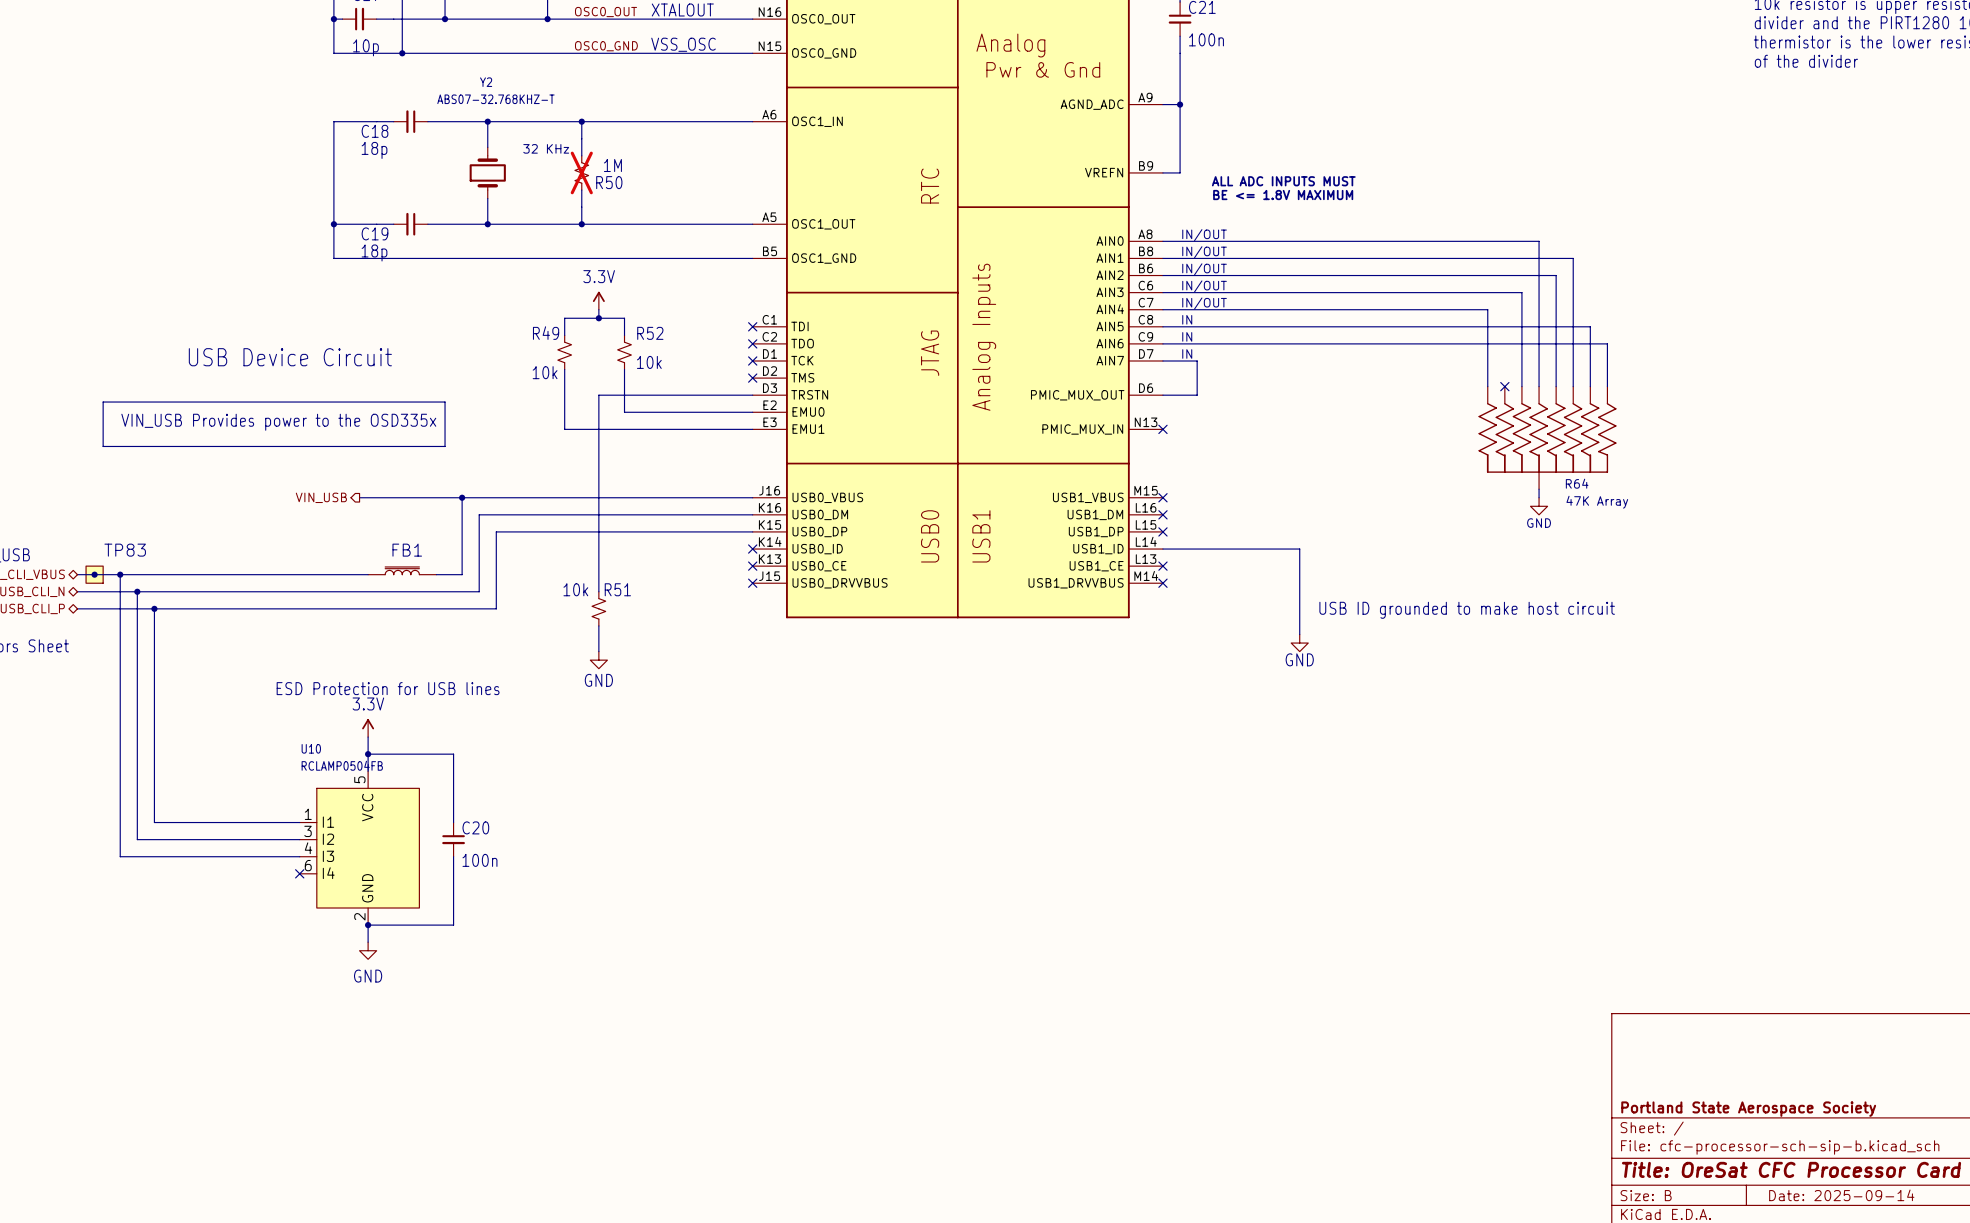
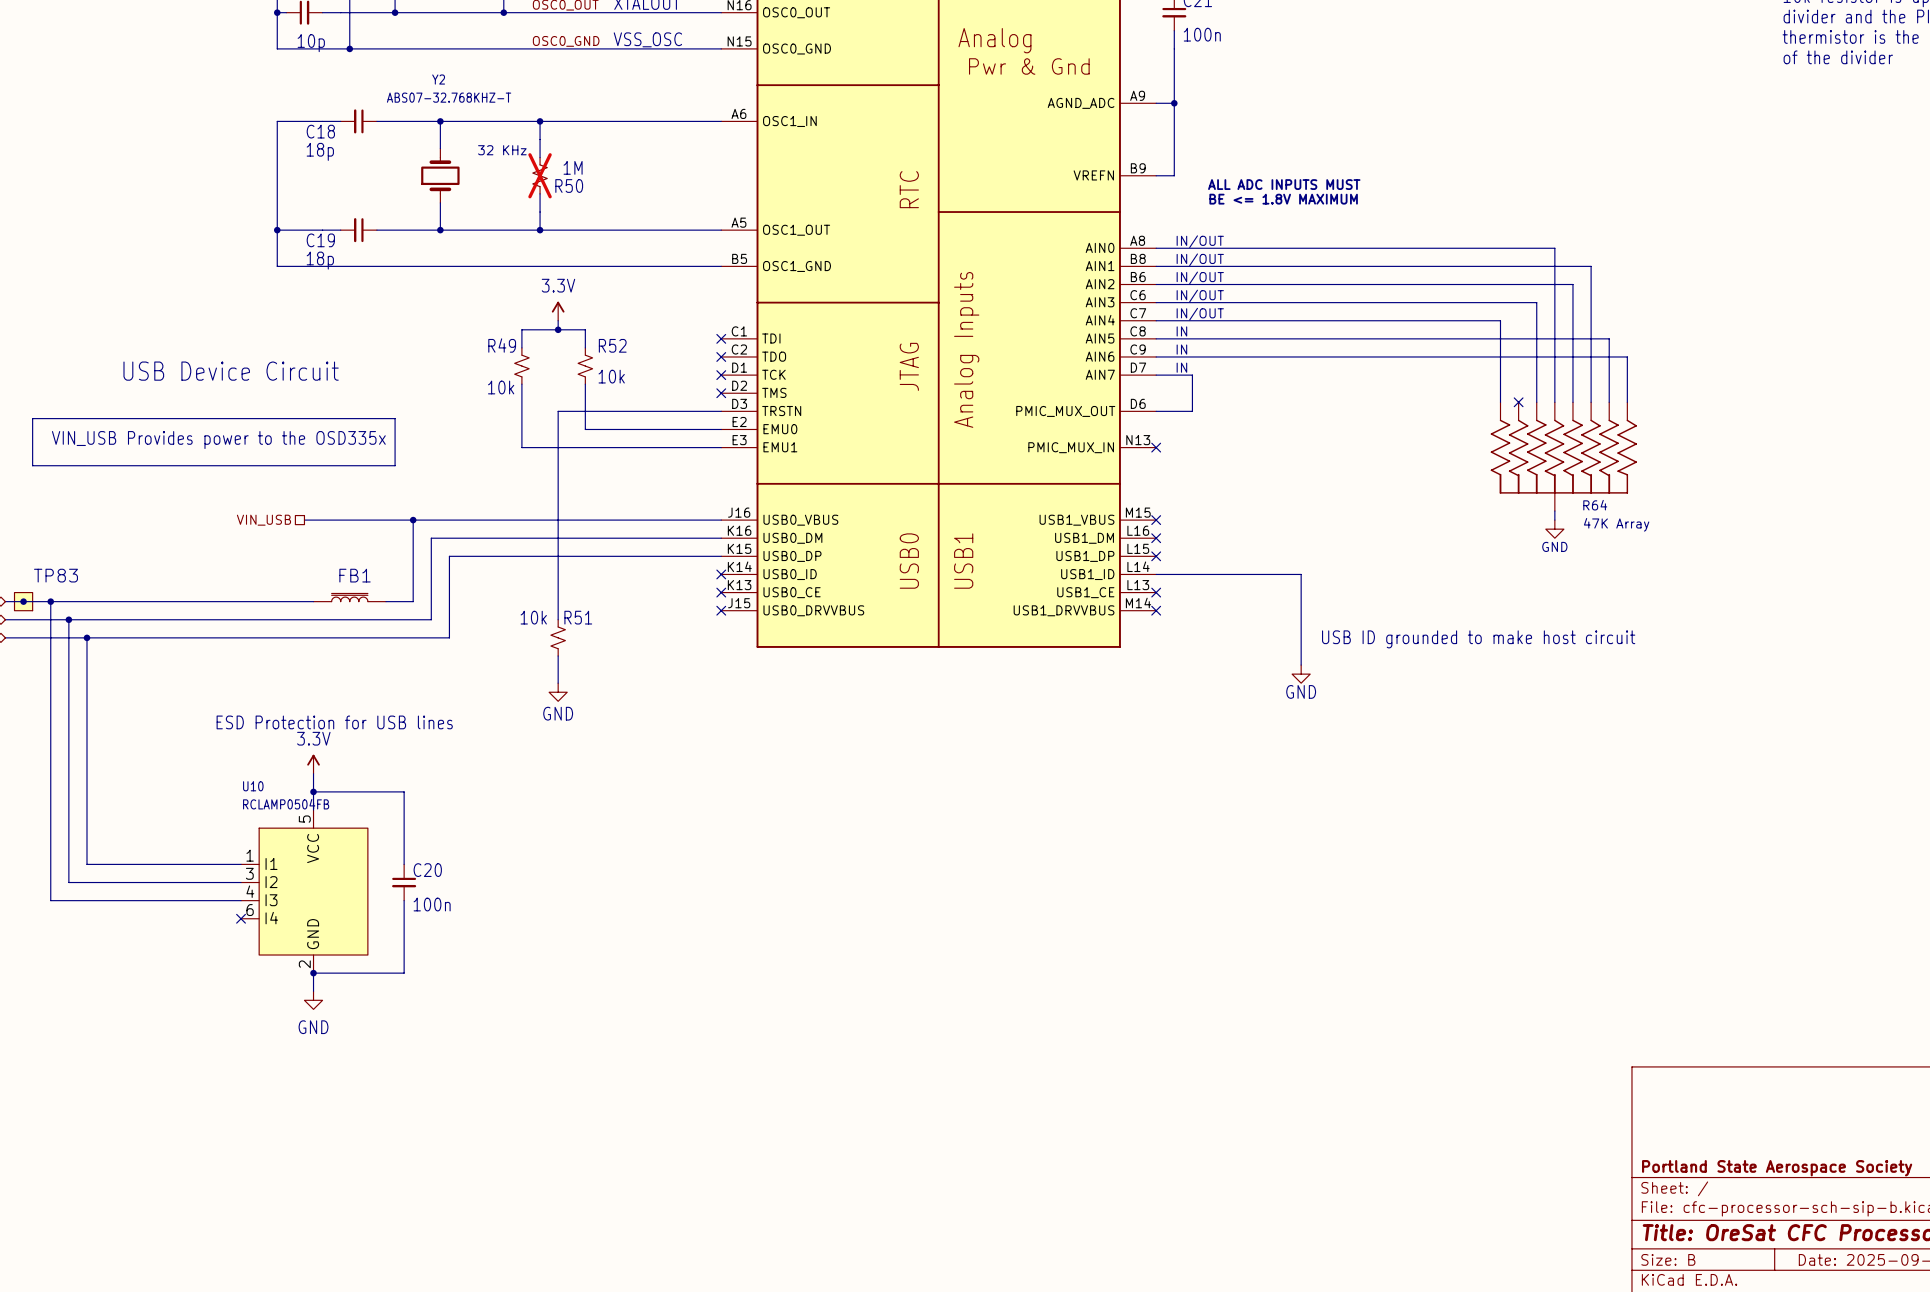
hierarchical label shape: output (321, 497) -> passive (263, 520)

